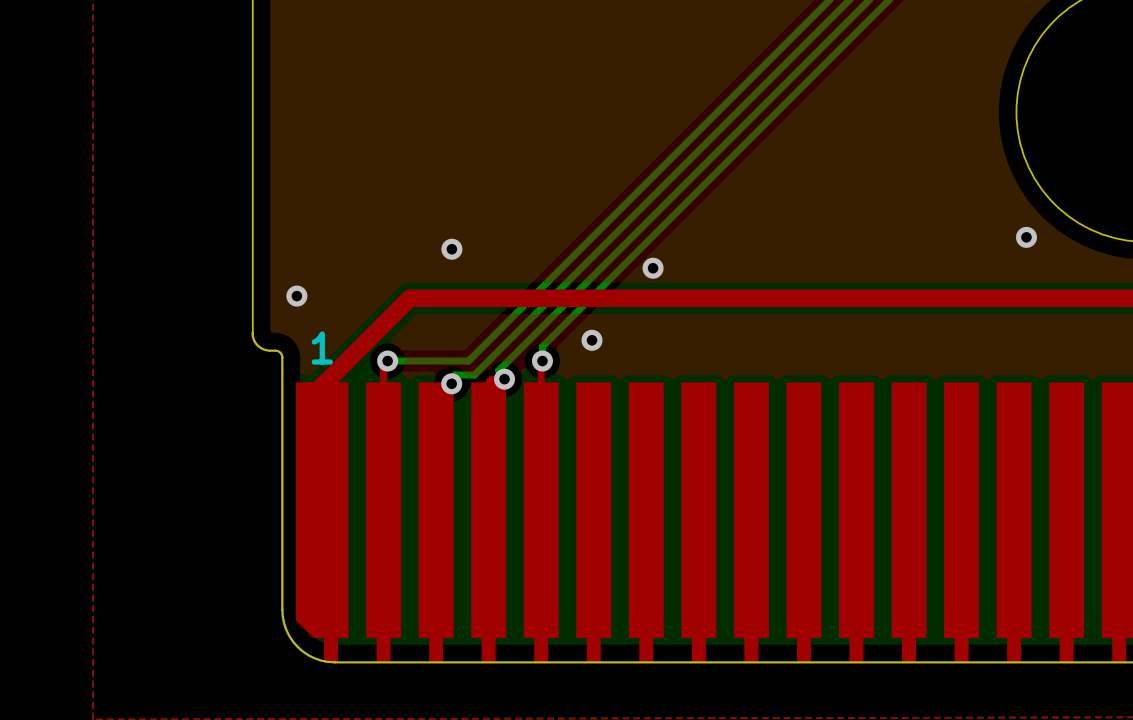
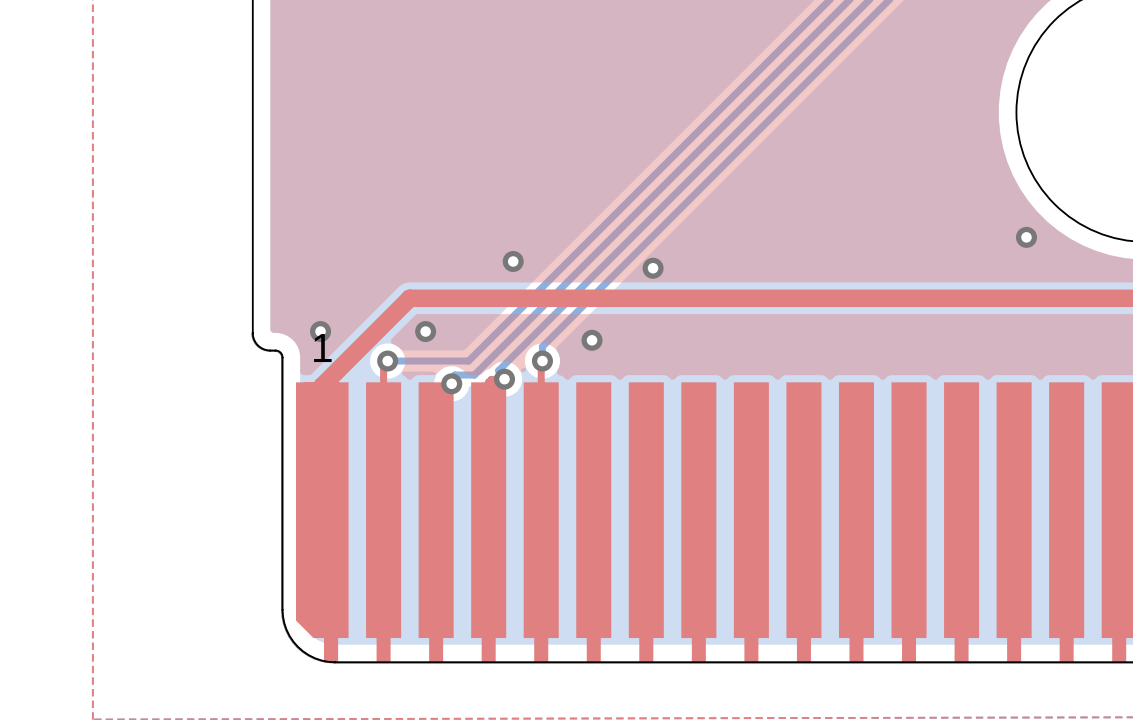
via: (451, 249) -> none
via: none -> (513, 261)
via position: (296, 296) -> (320, 331)
via: none -> (425, 331)

